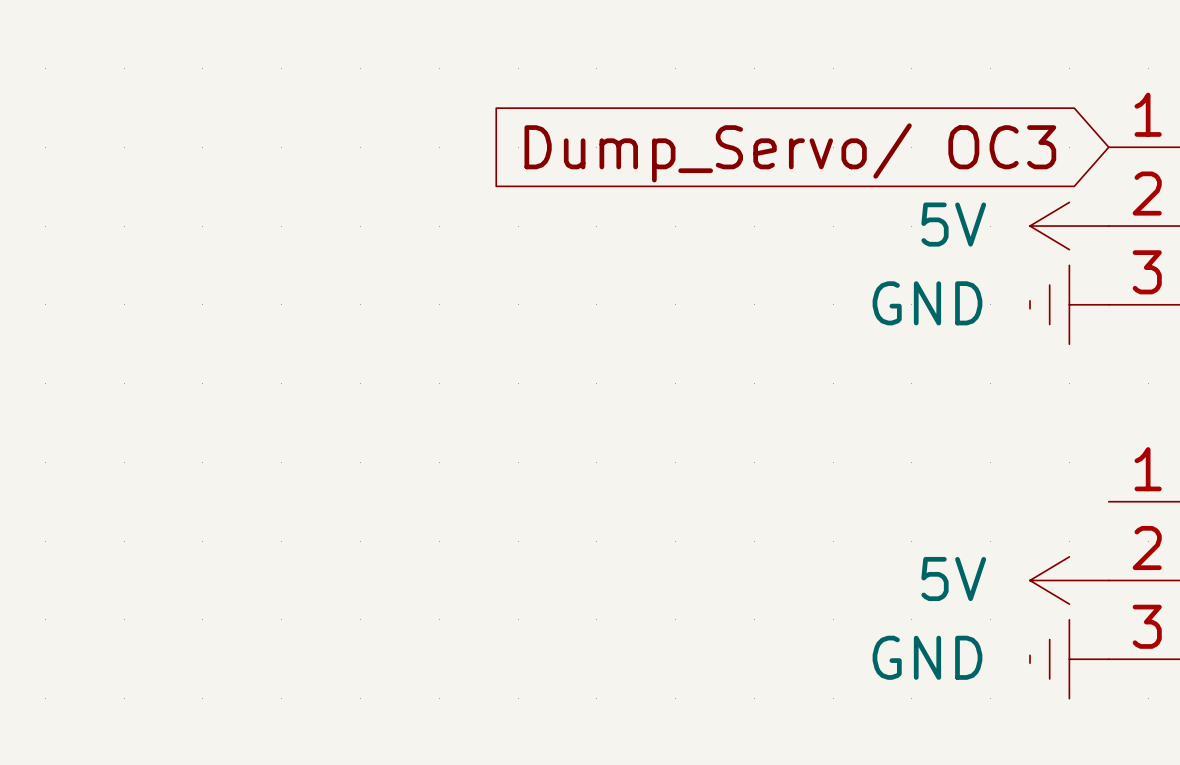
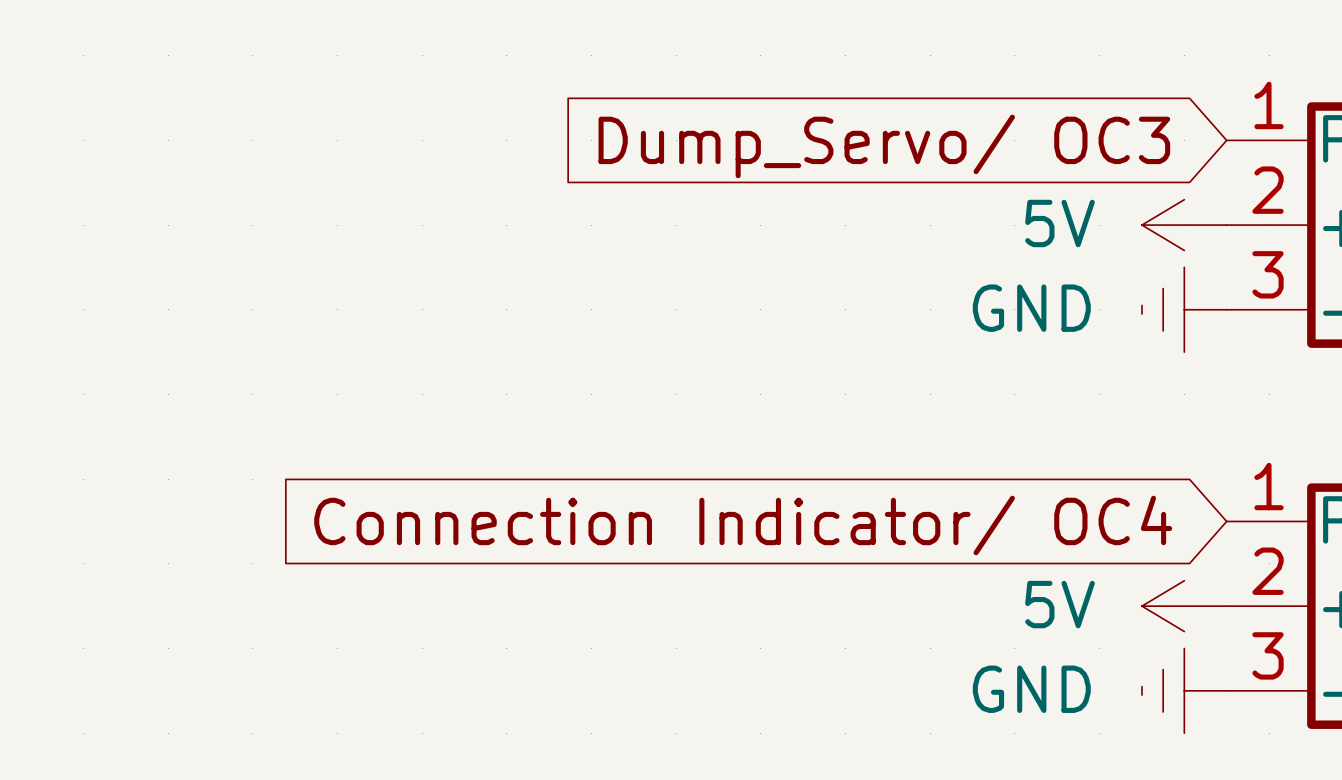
global label: none -> Connection Indicator/ OC4 (743, 525)

